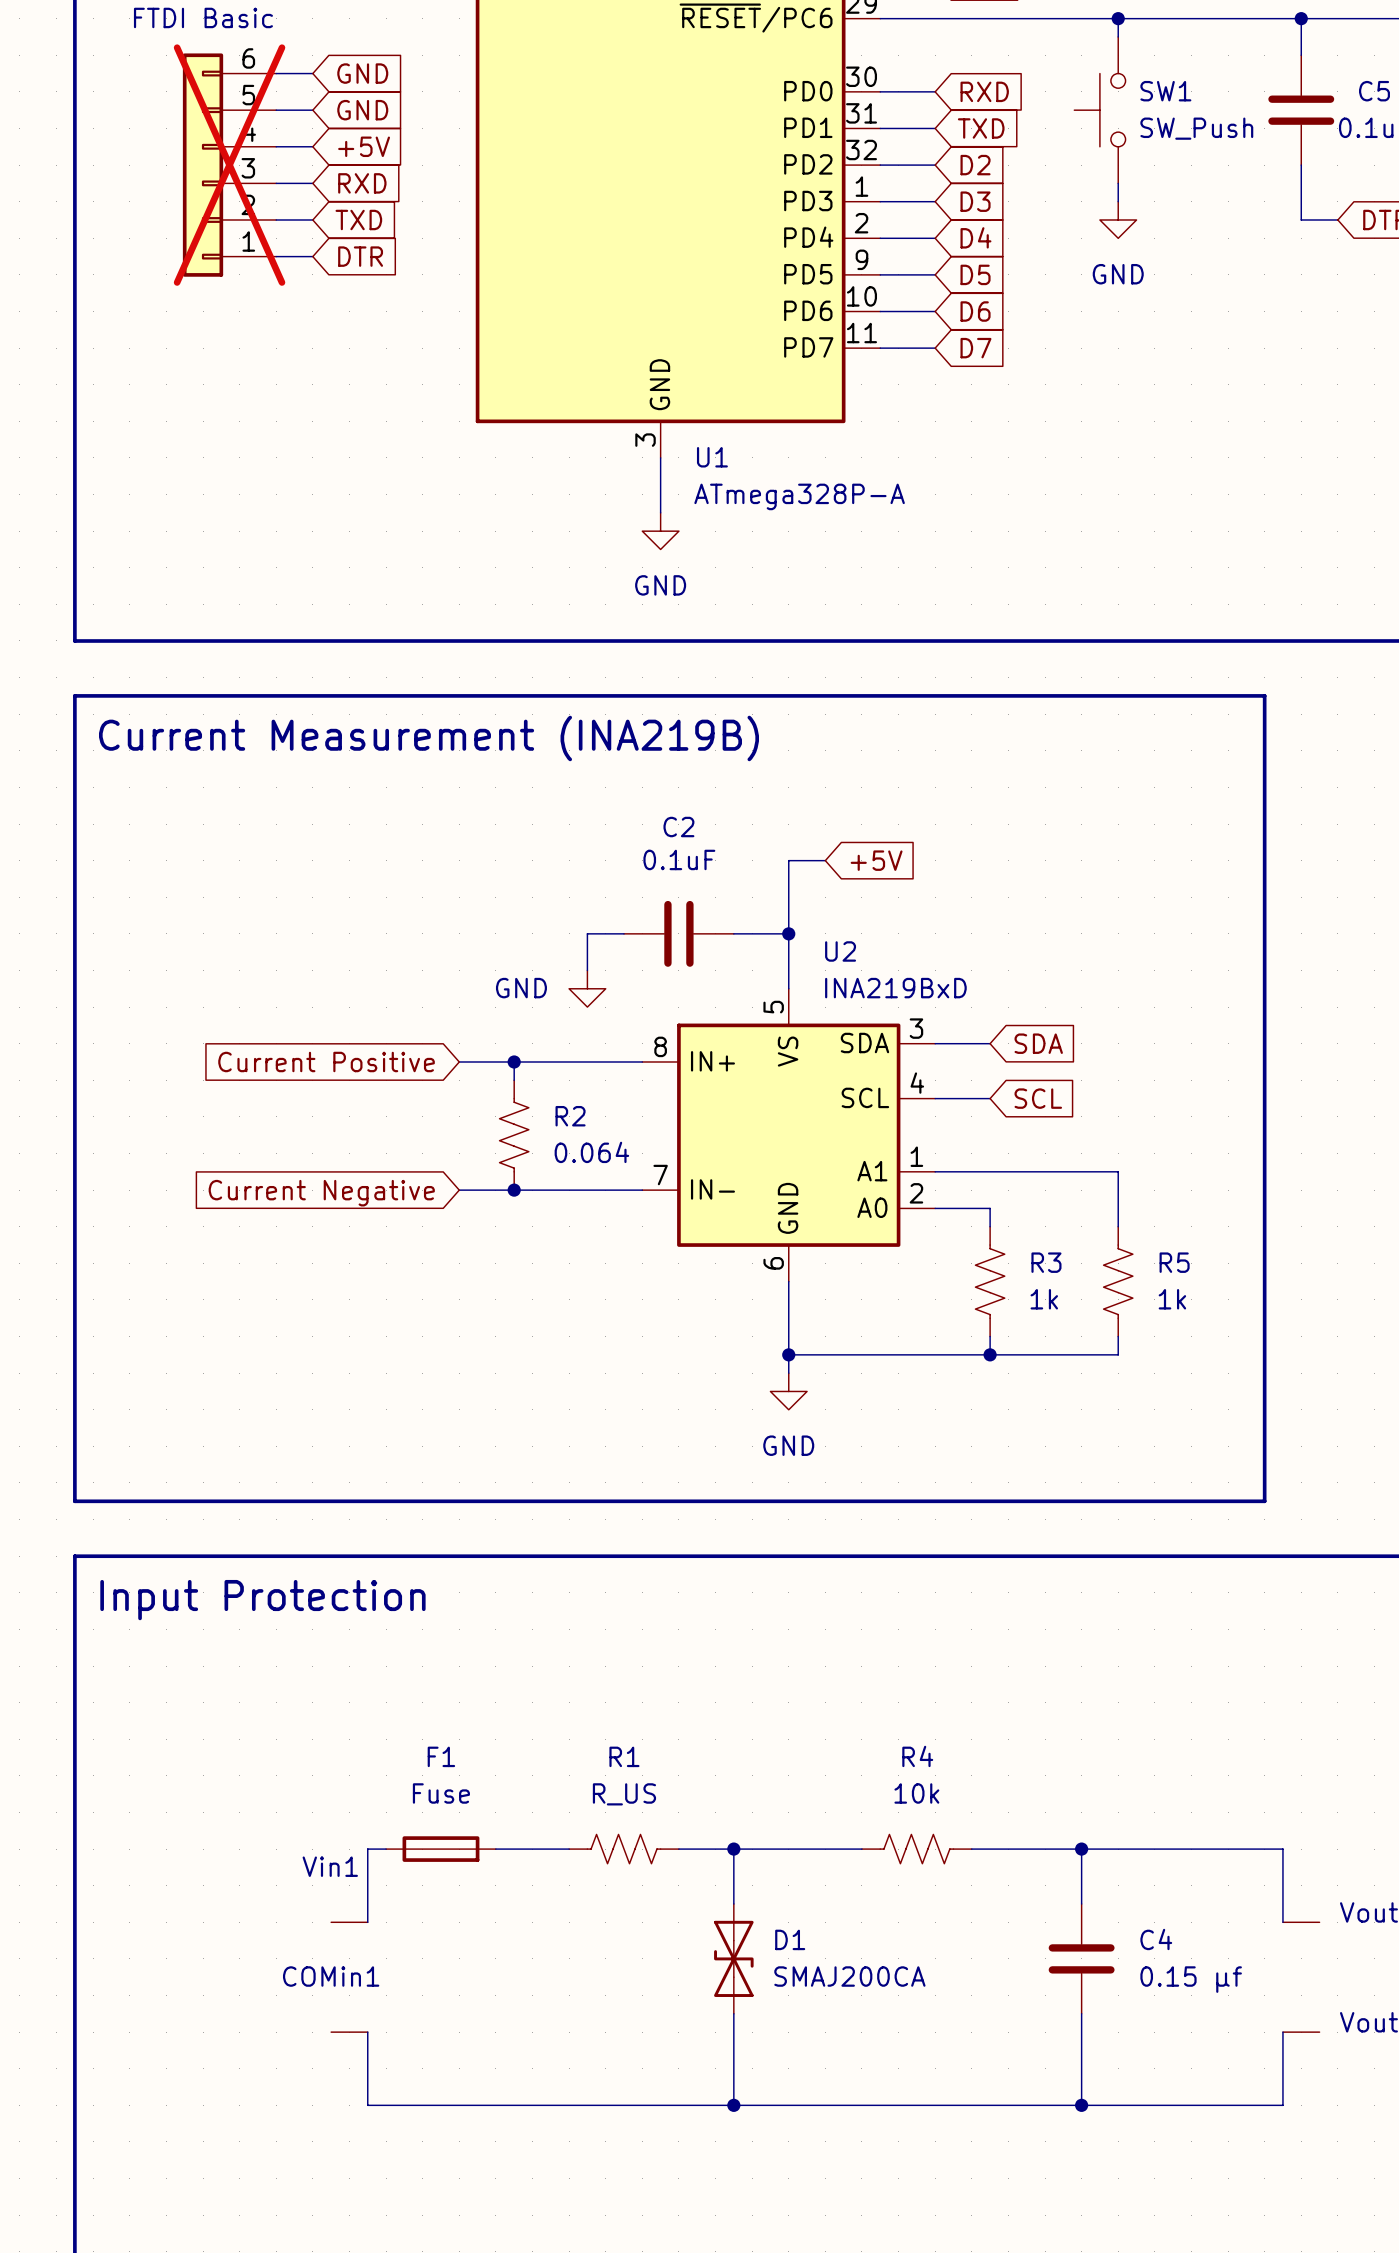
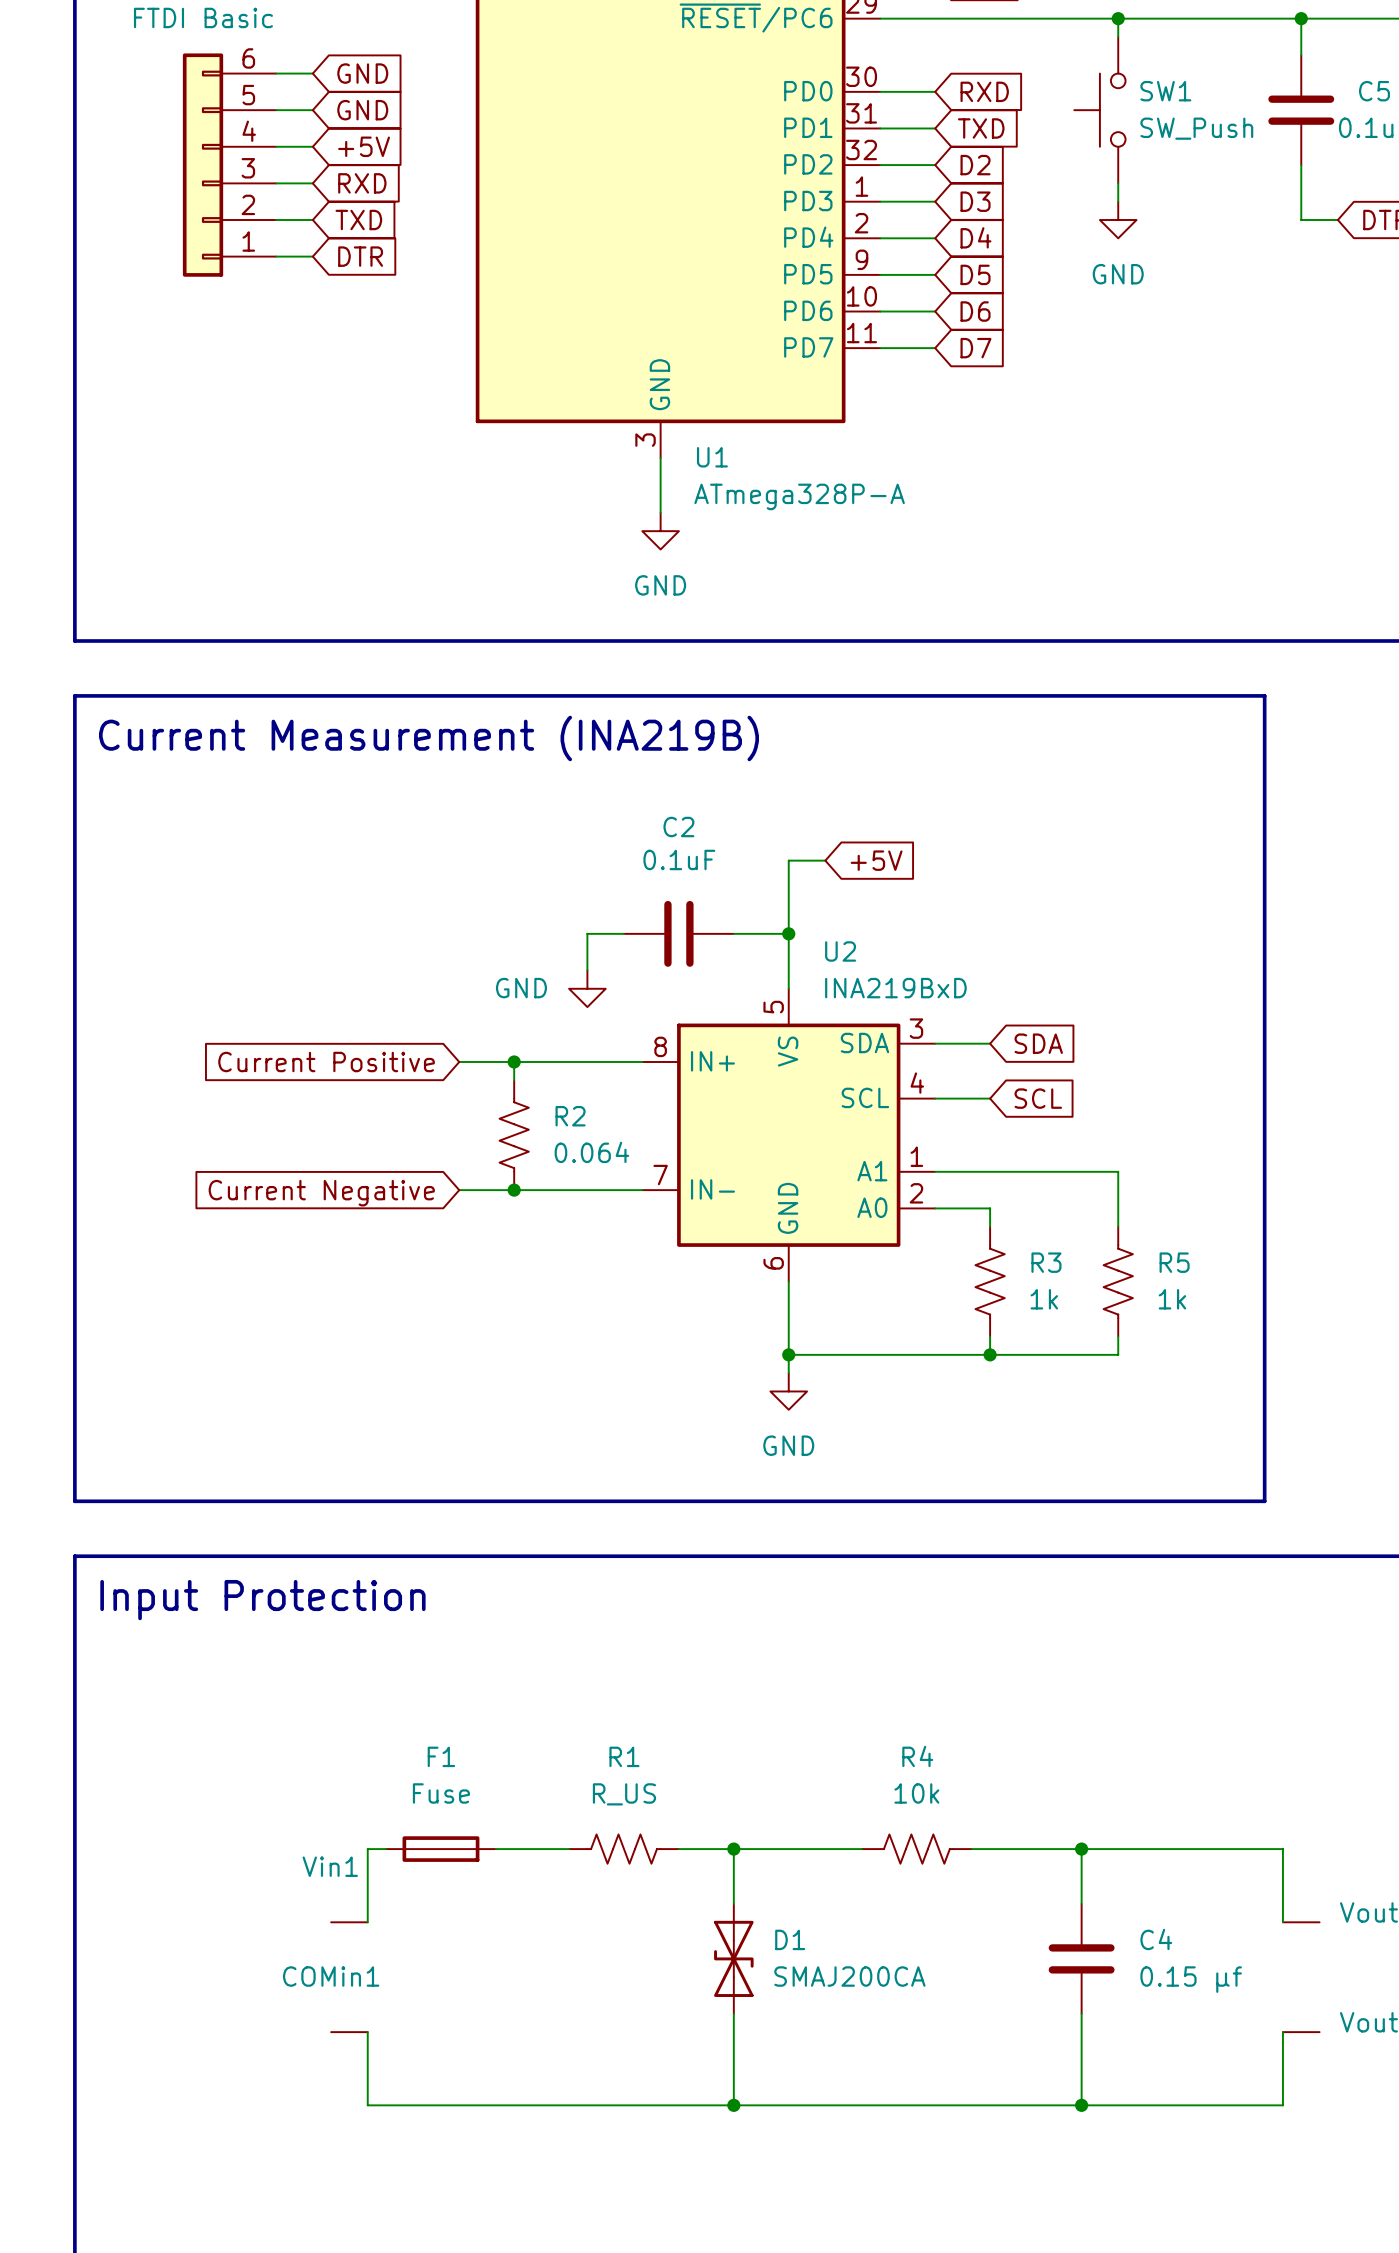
part do-not-place cross: (229, 165) -> none

